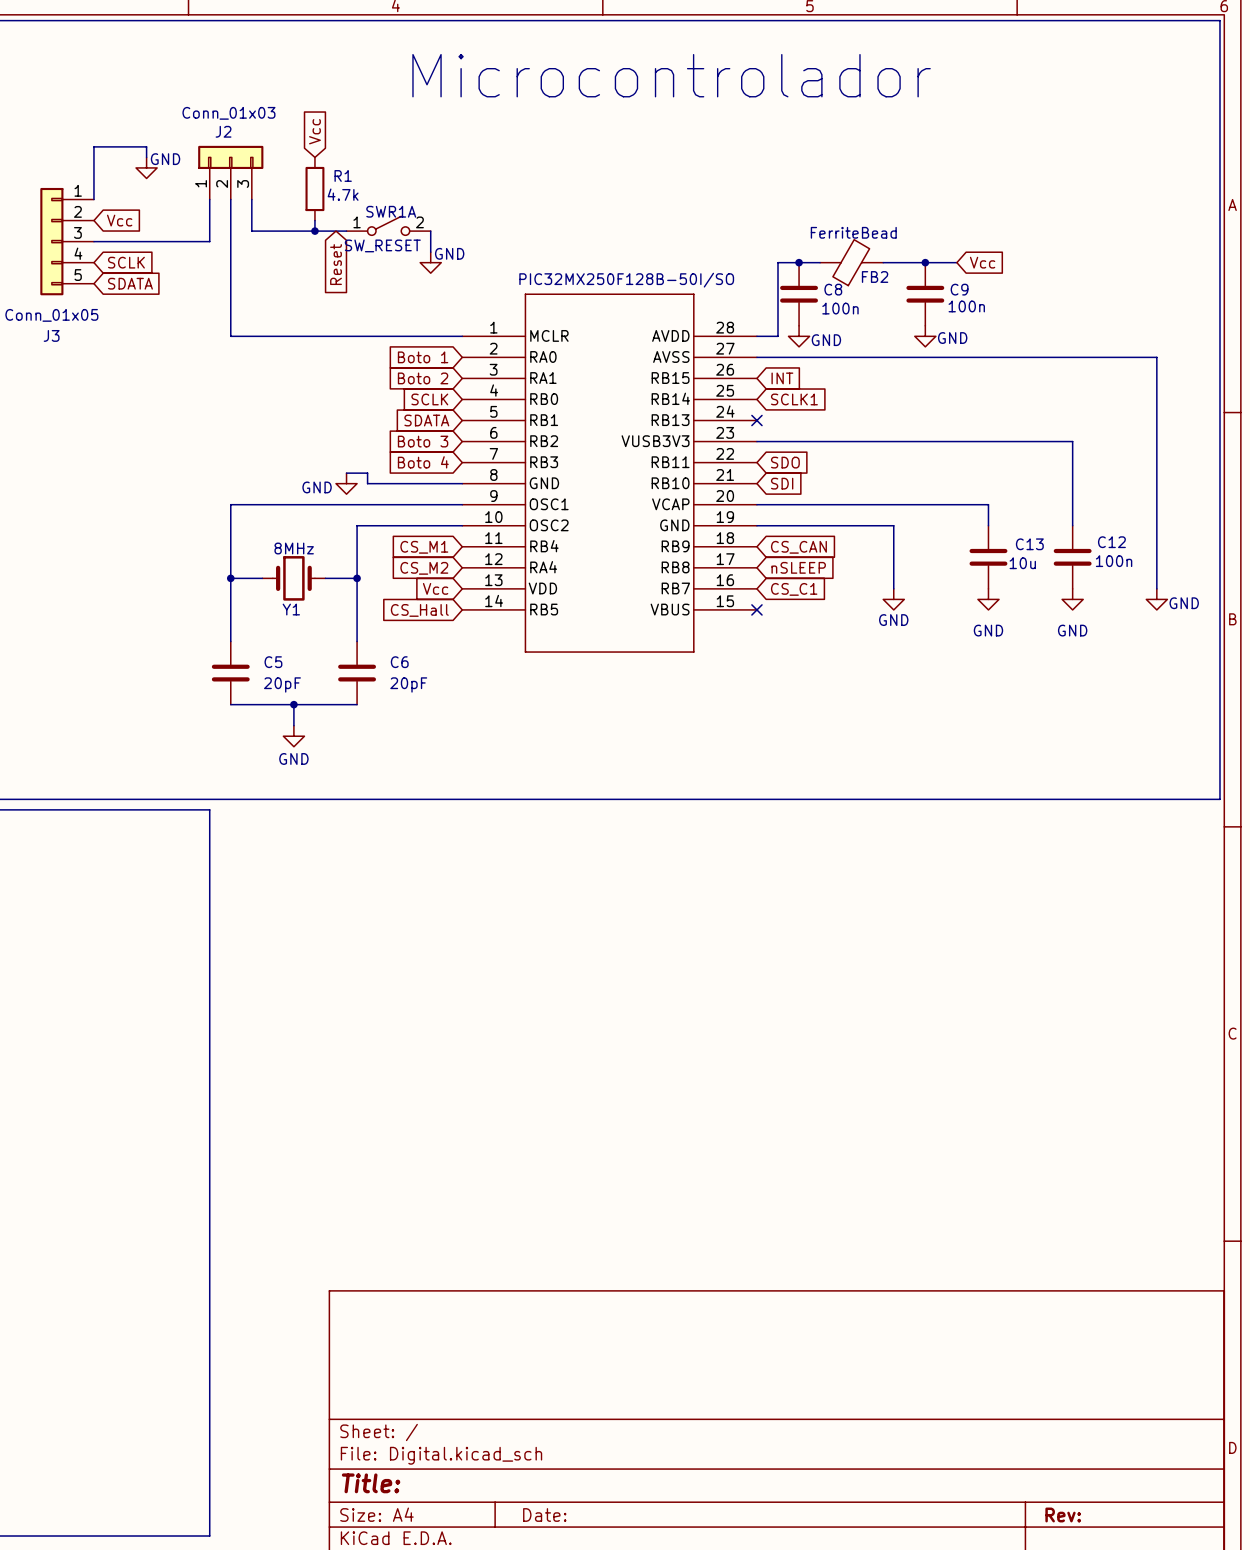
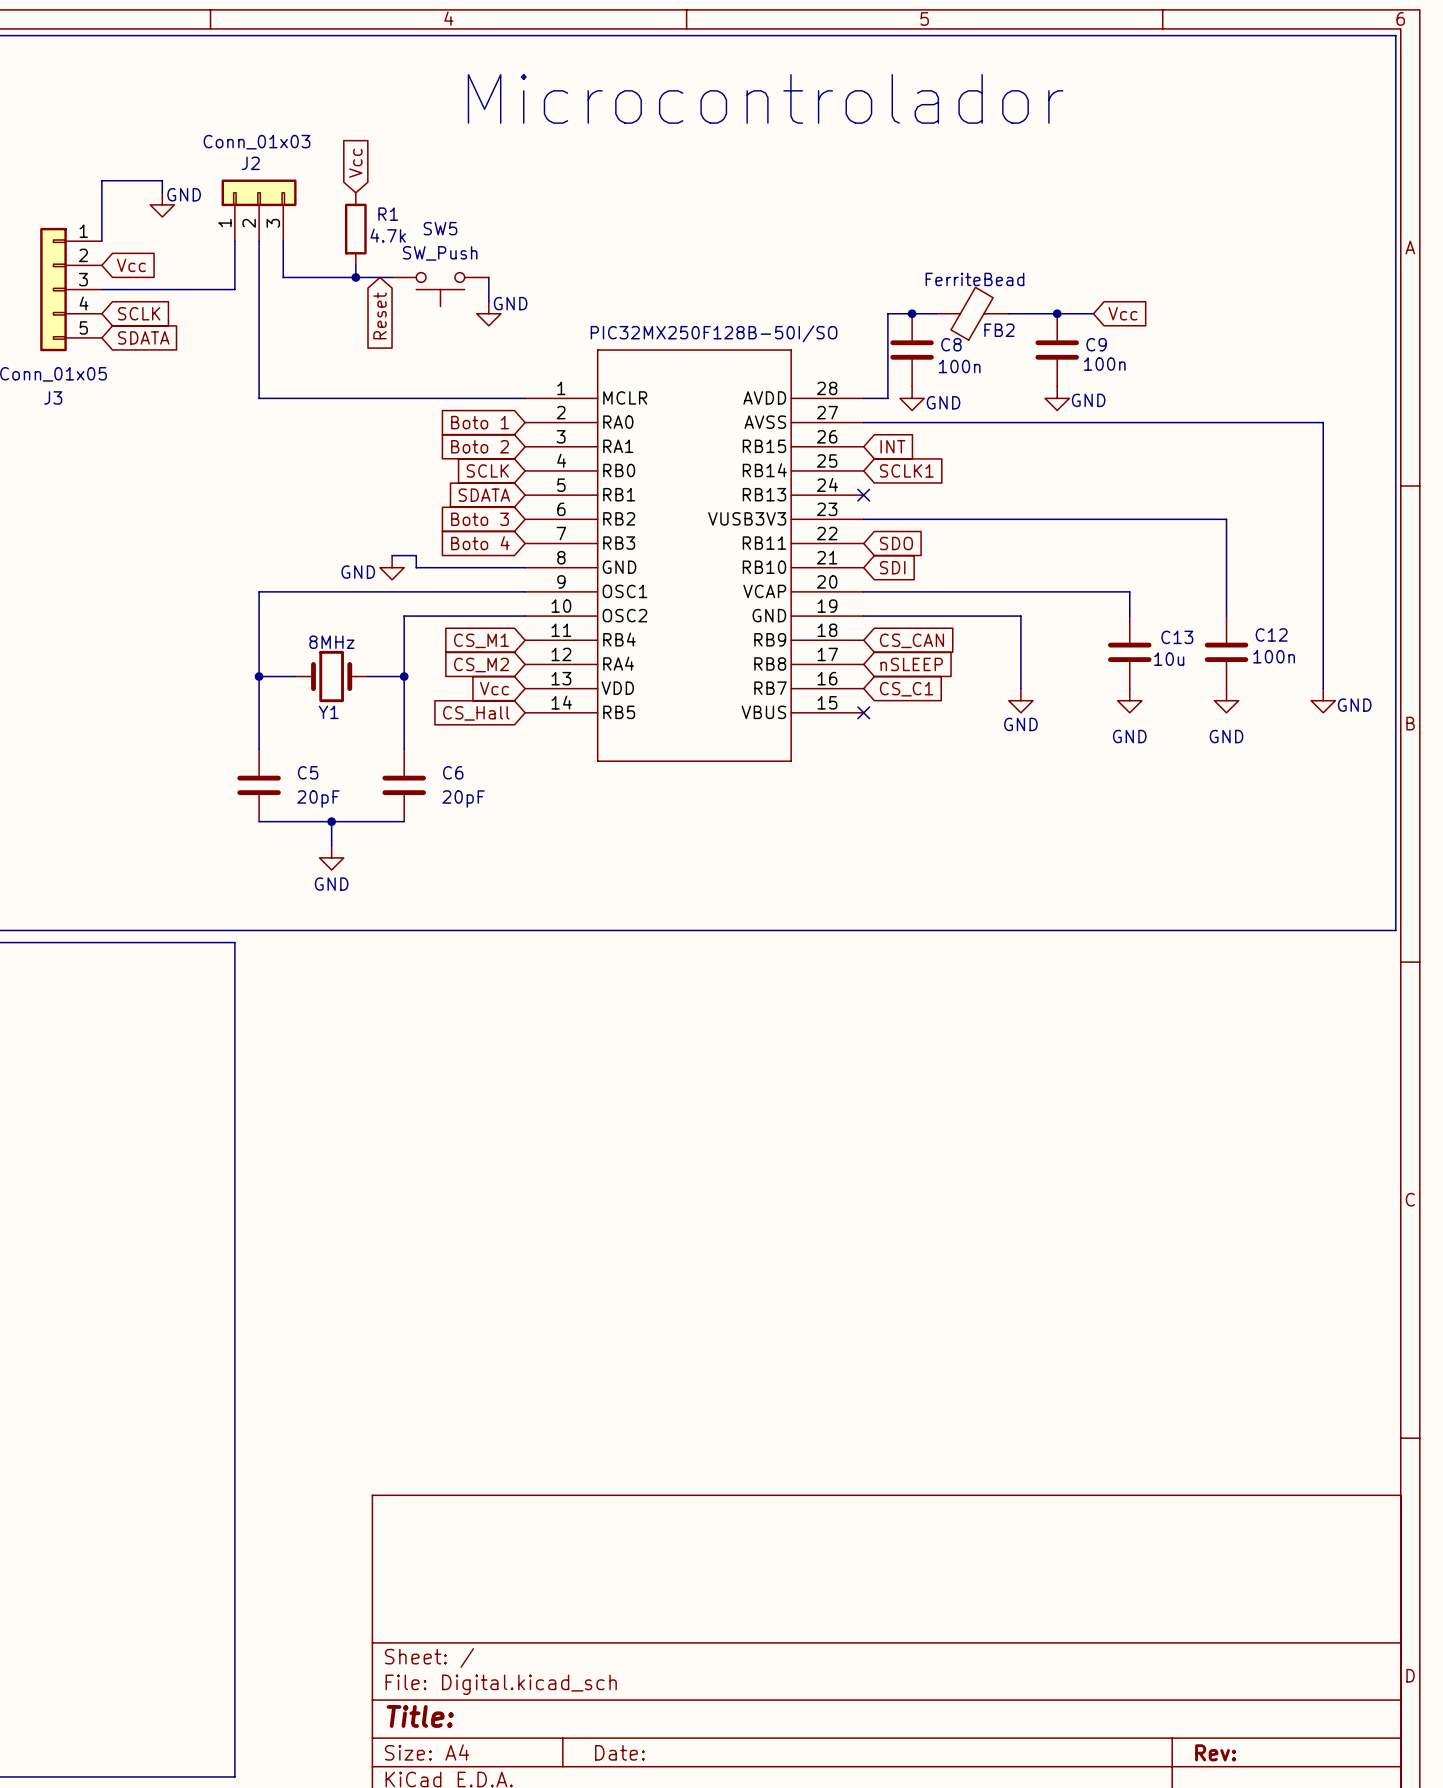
SWR1A: SW_RESET (388, 225) -> none
SW5: none -> SW_Push (440, 289)

